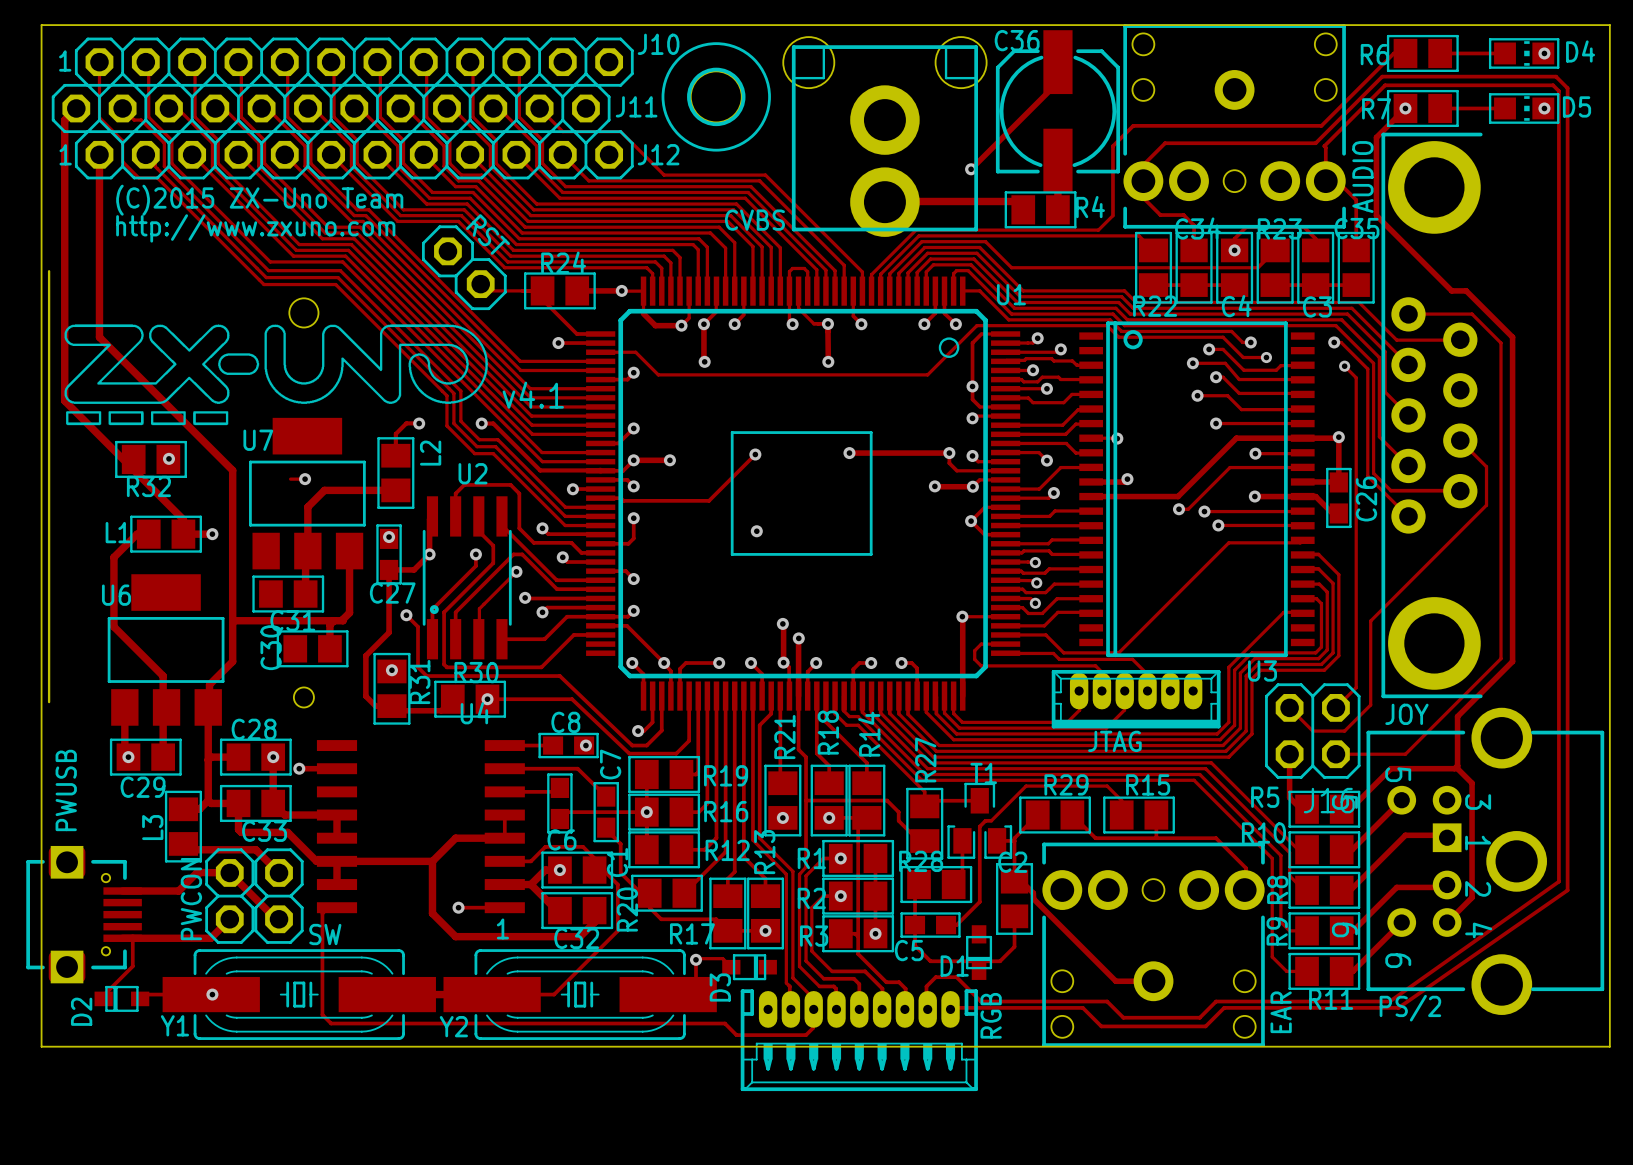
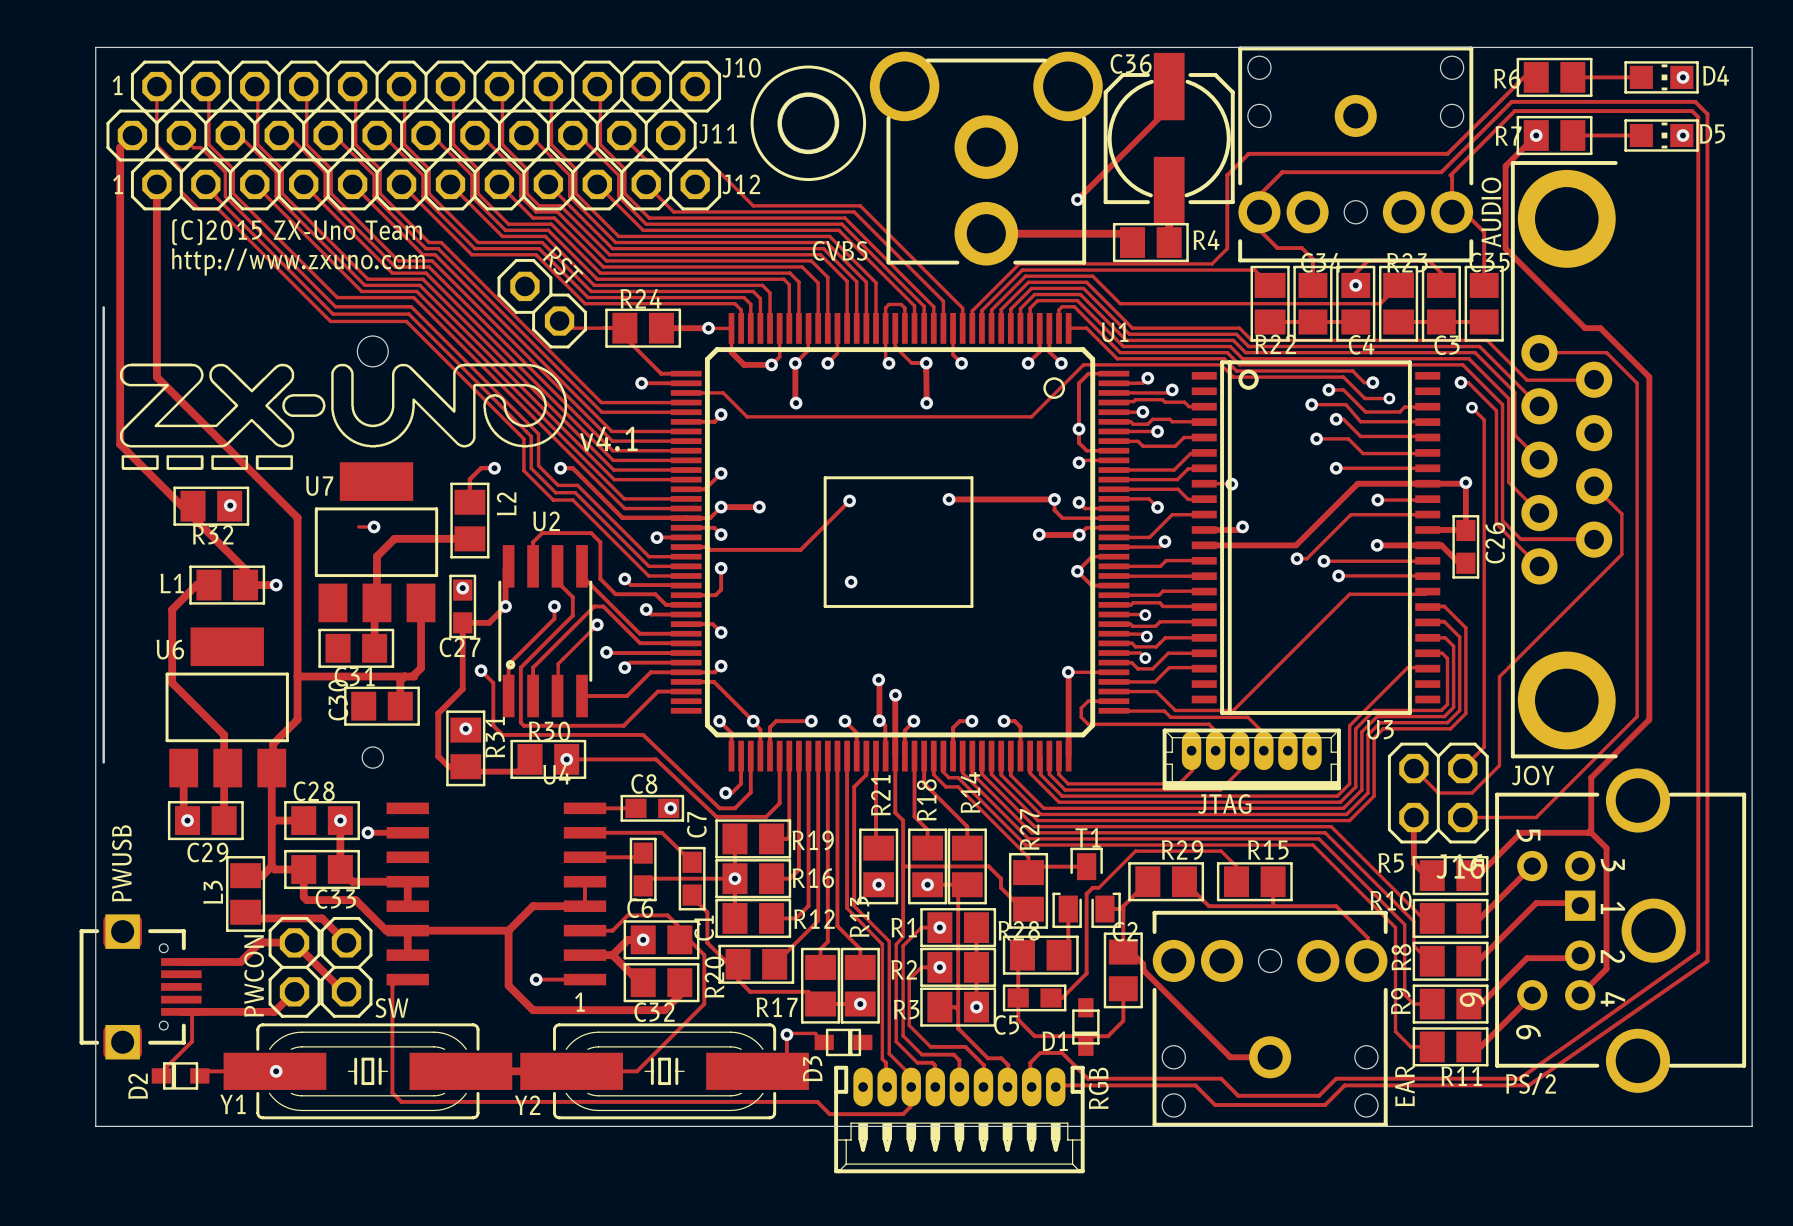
CVBS footprint: [783, 37, 987, 237] -> [869, 51, 1103, 266]

